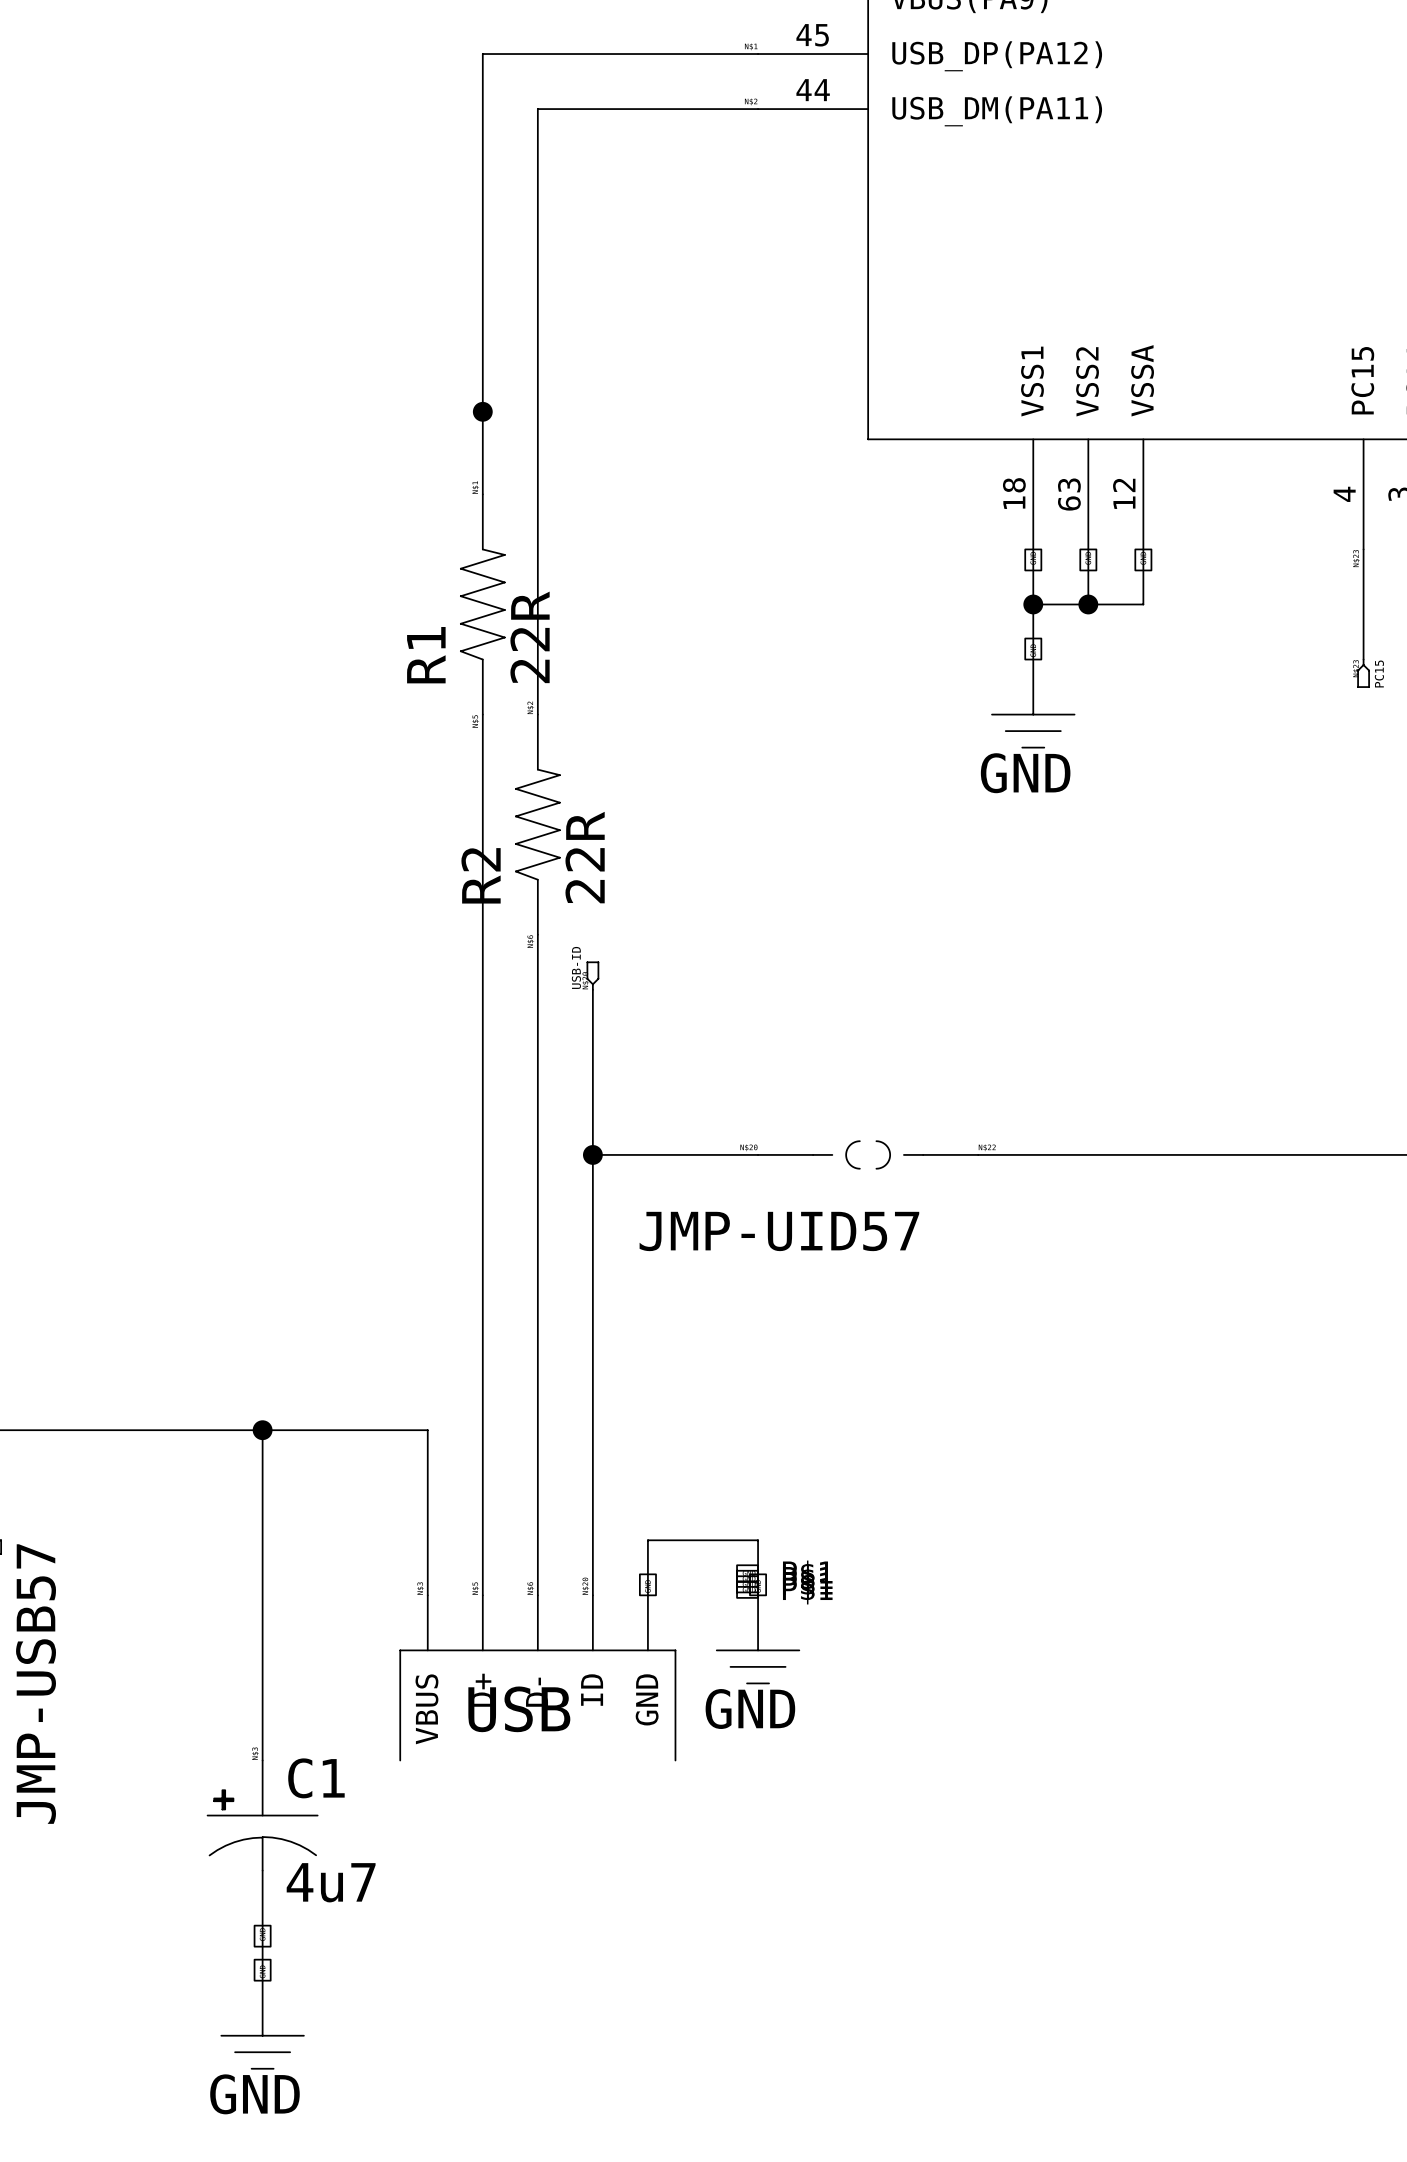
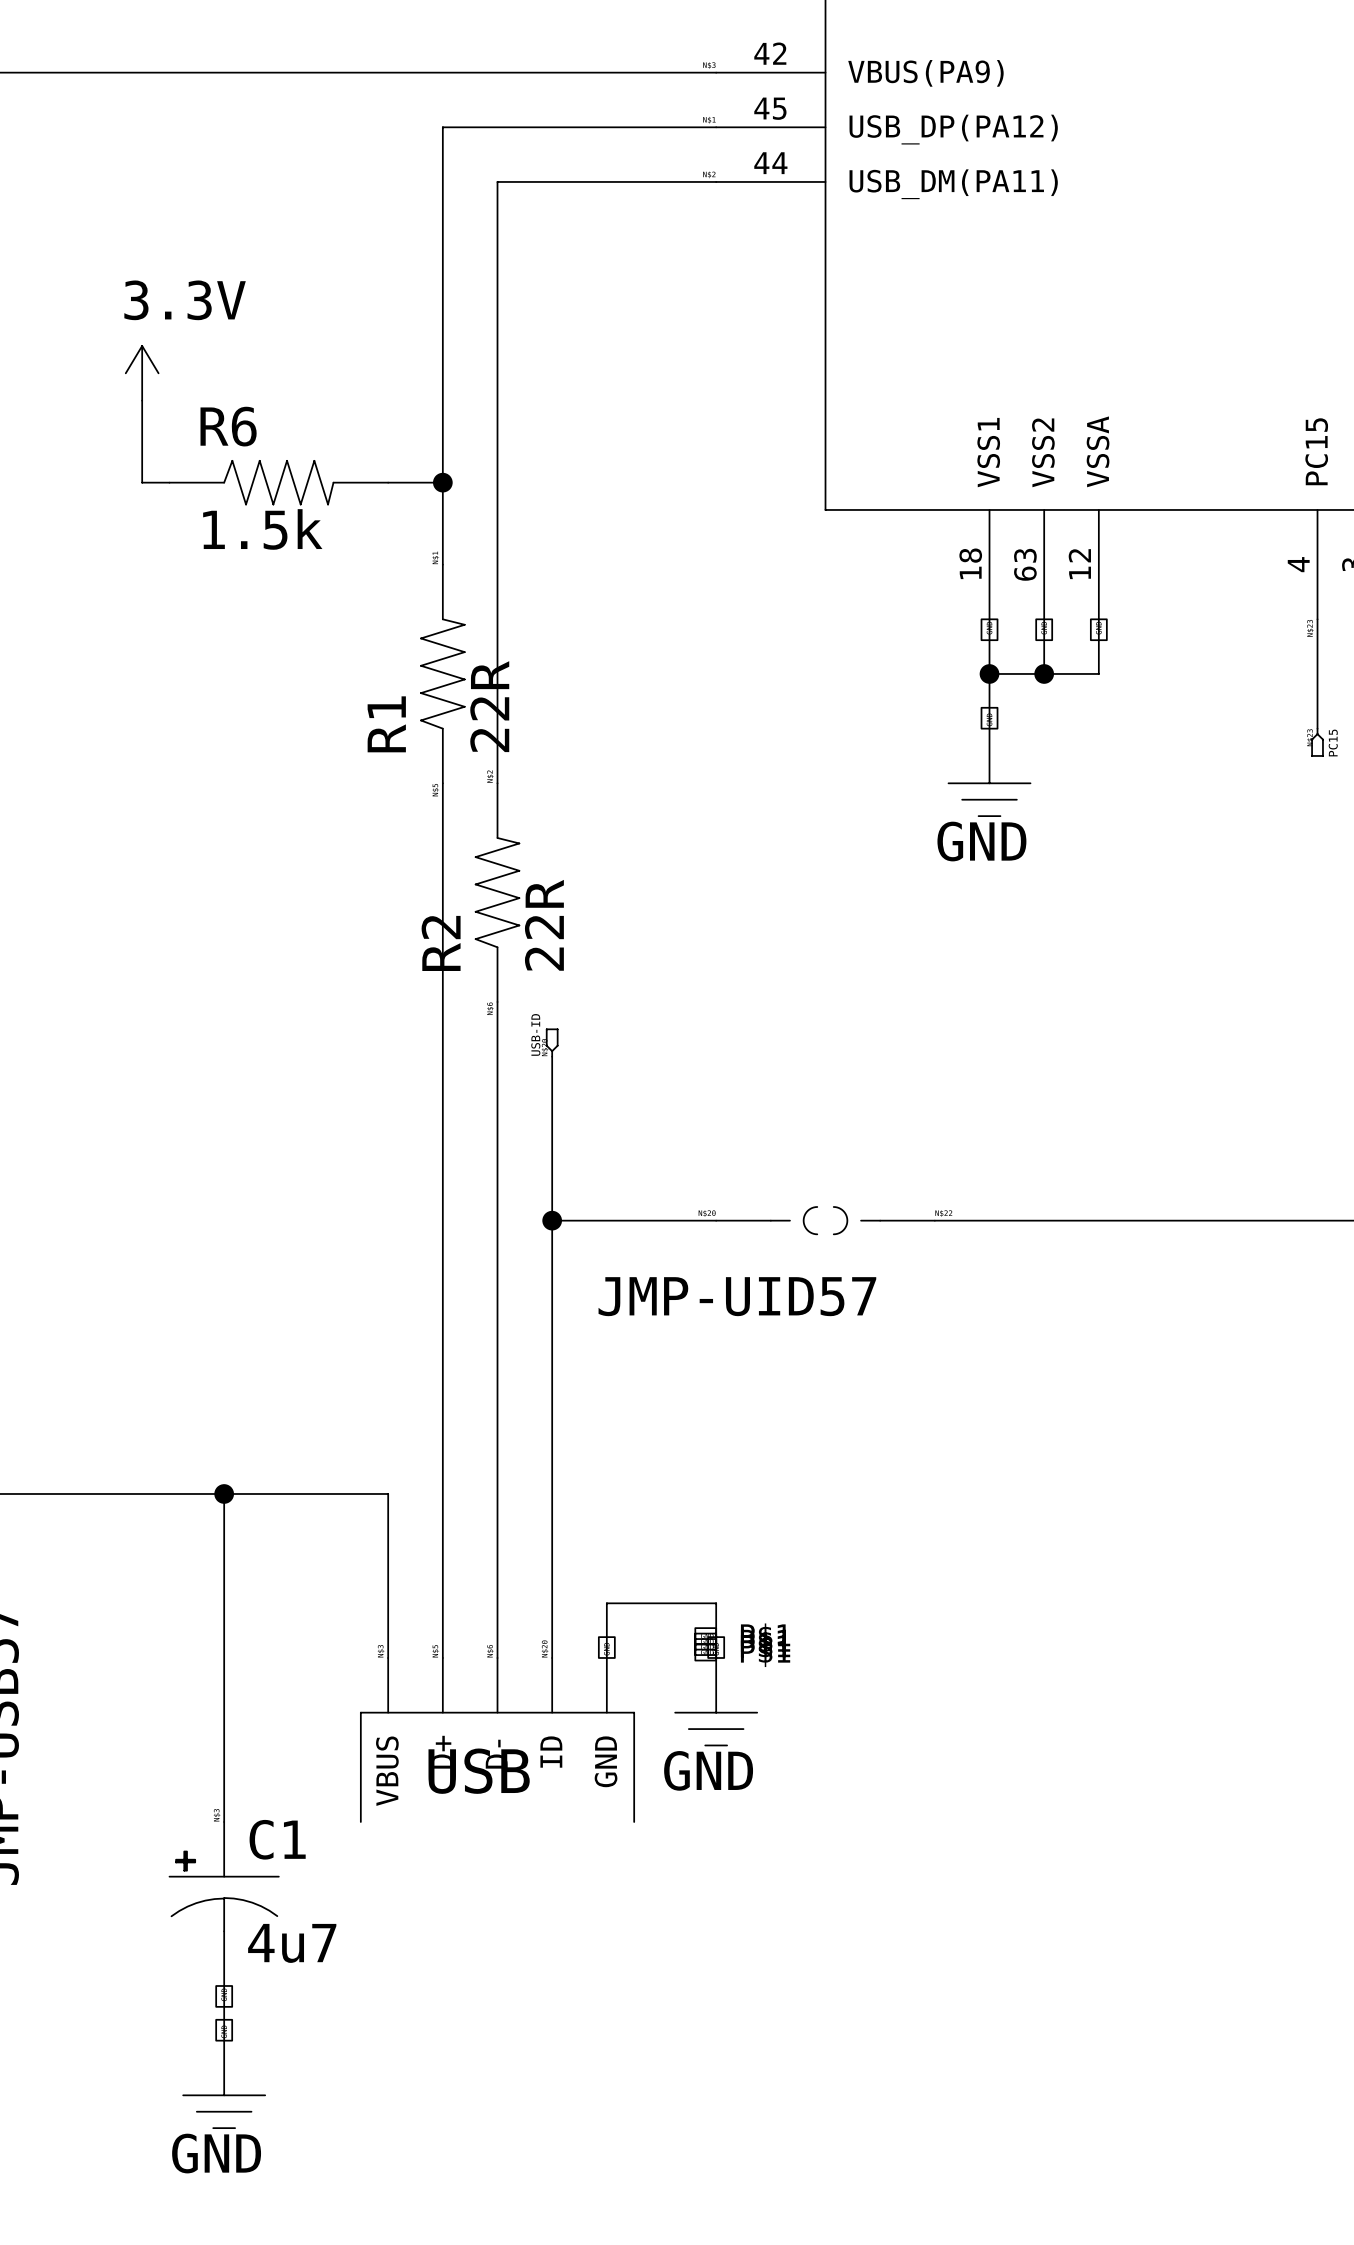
power symbol: none -> 3.3V (142, 373)
wire: none -> (142, 400) (142, 482) (169, 482)
R6: none -> 1.5k (278, 482)
wire: none -> (388, 482) (442, 482)

